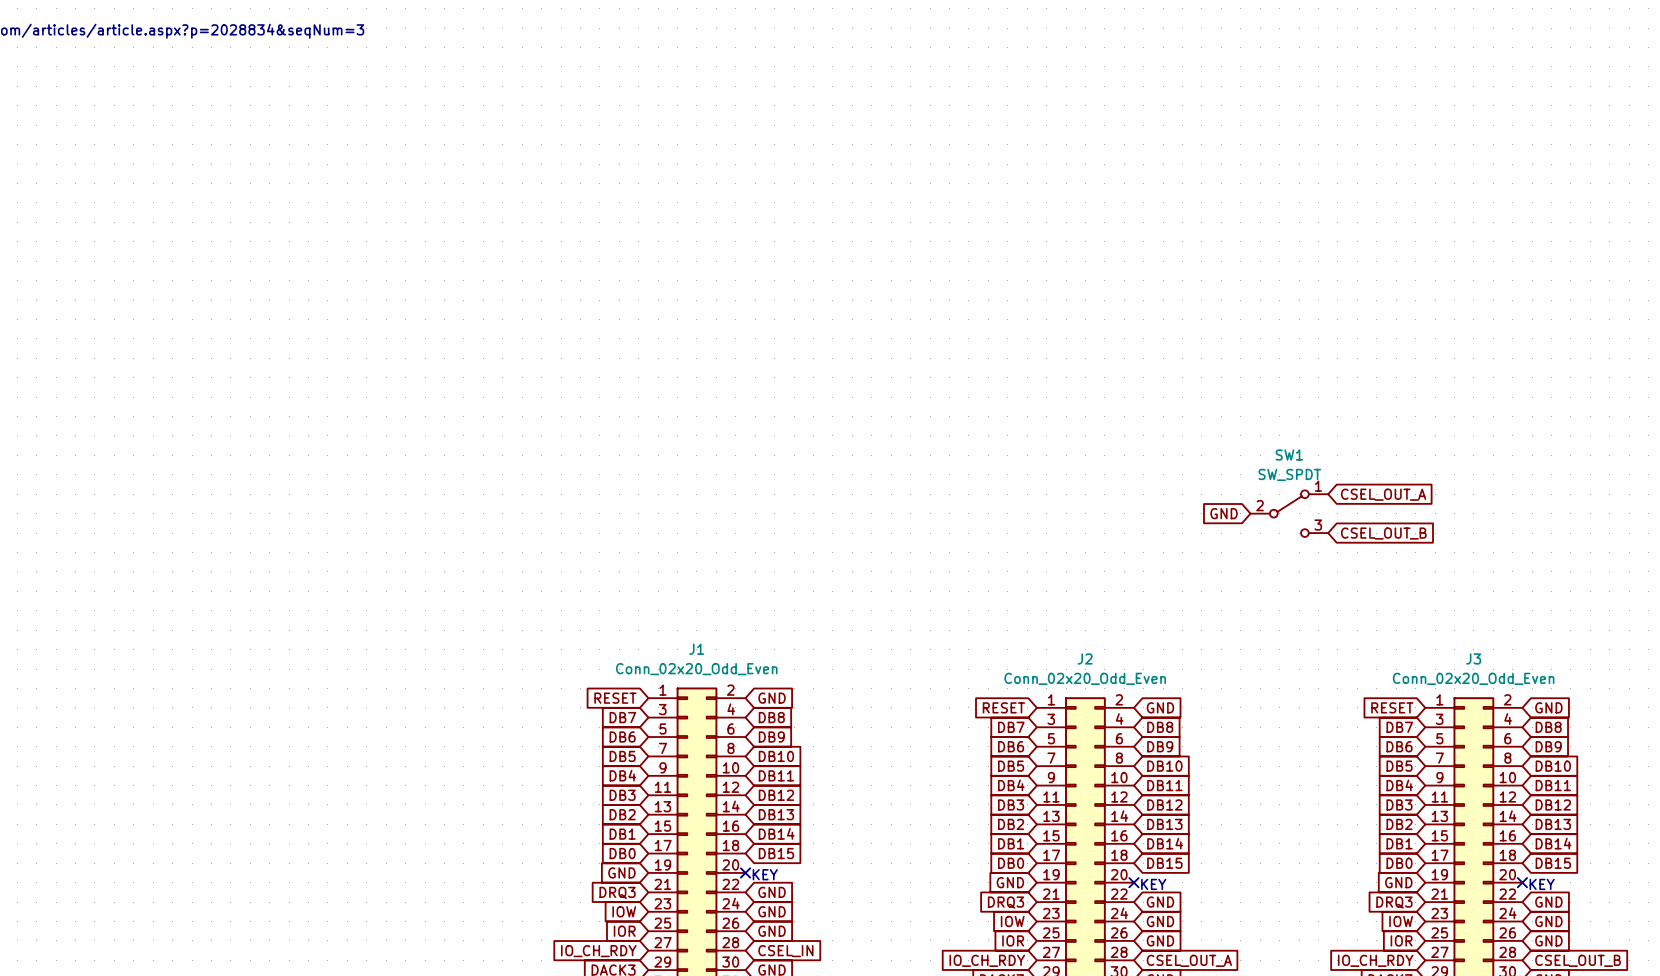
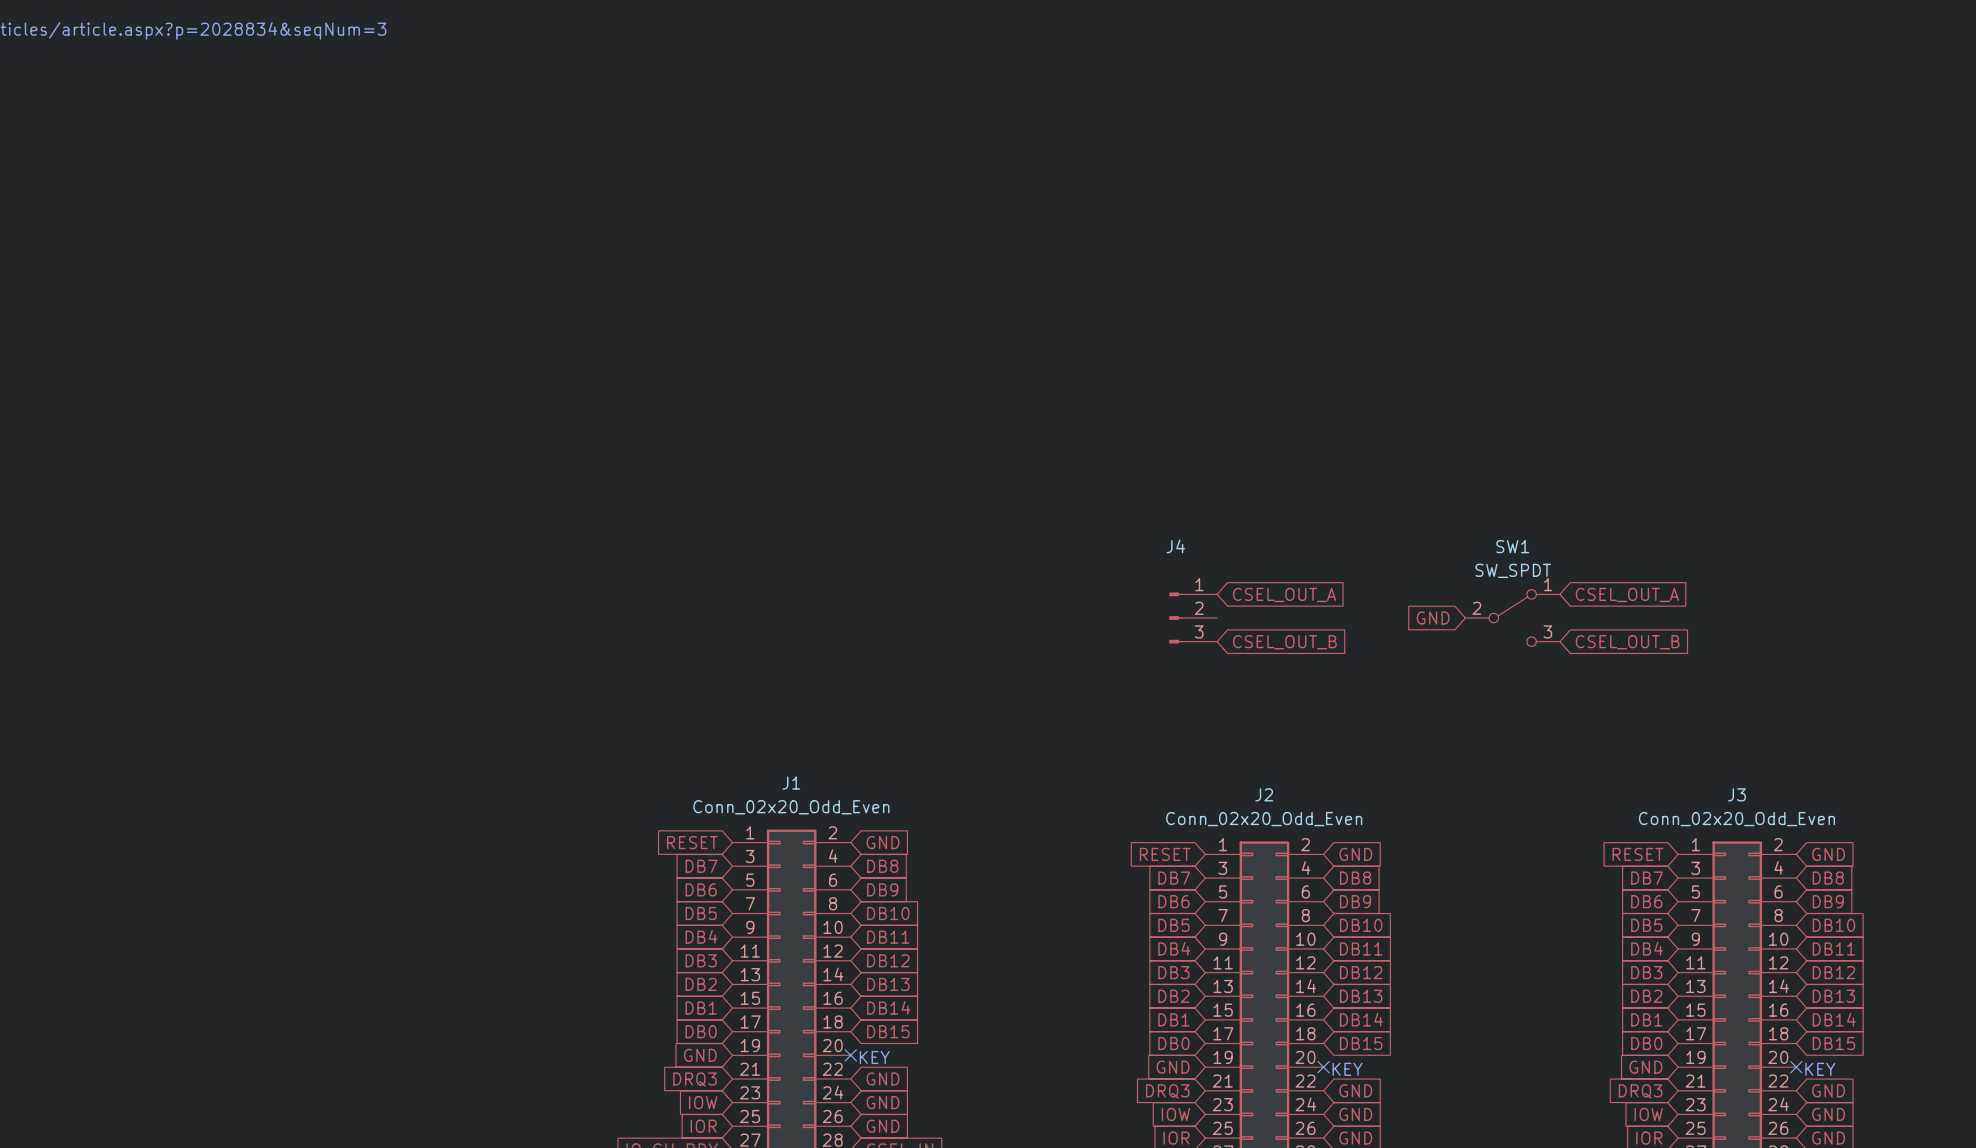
global label: none -> CSEL_OUT_A (1284, 594)
J4: none -> (1193, 618)
global label: none -> CSEL_OUT_B (1284, 642)

